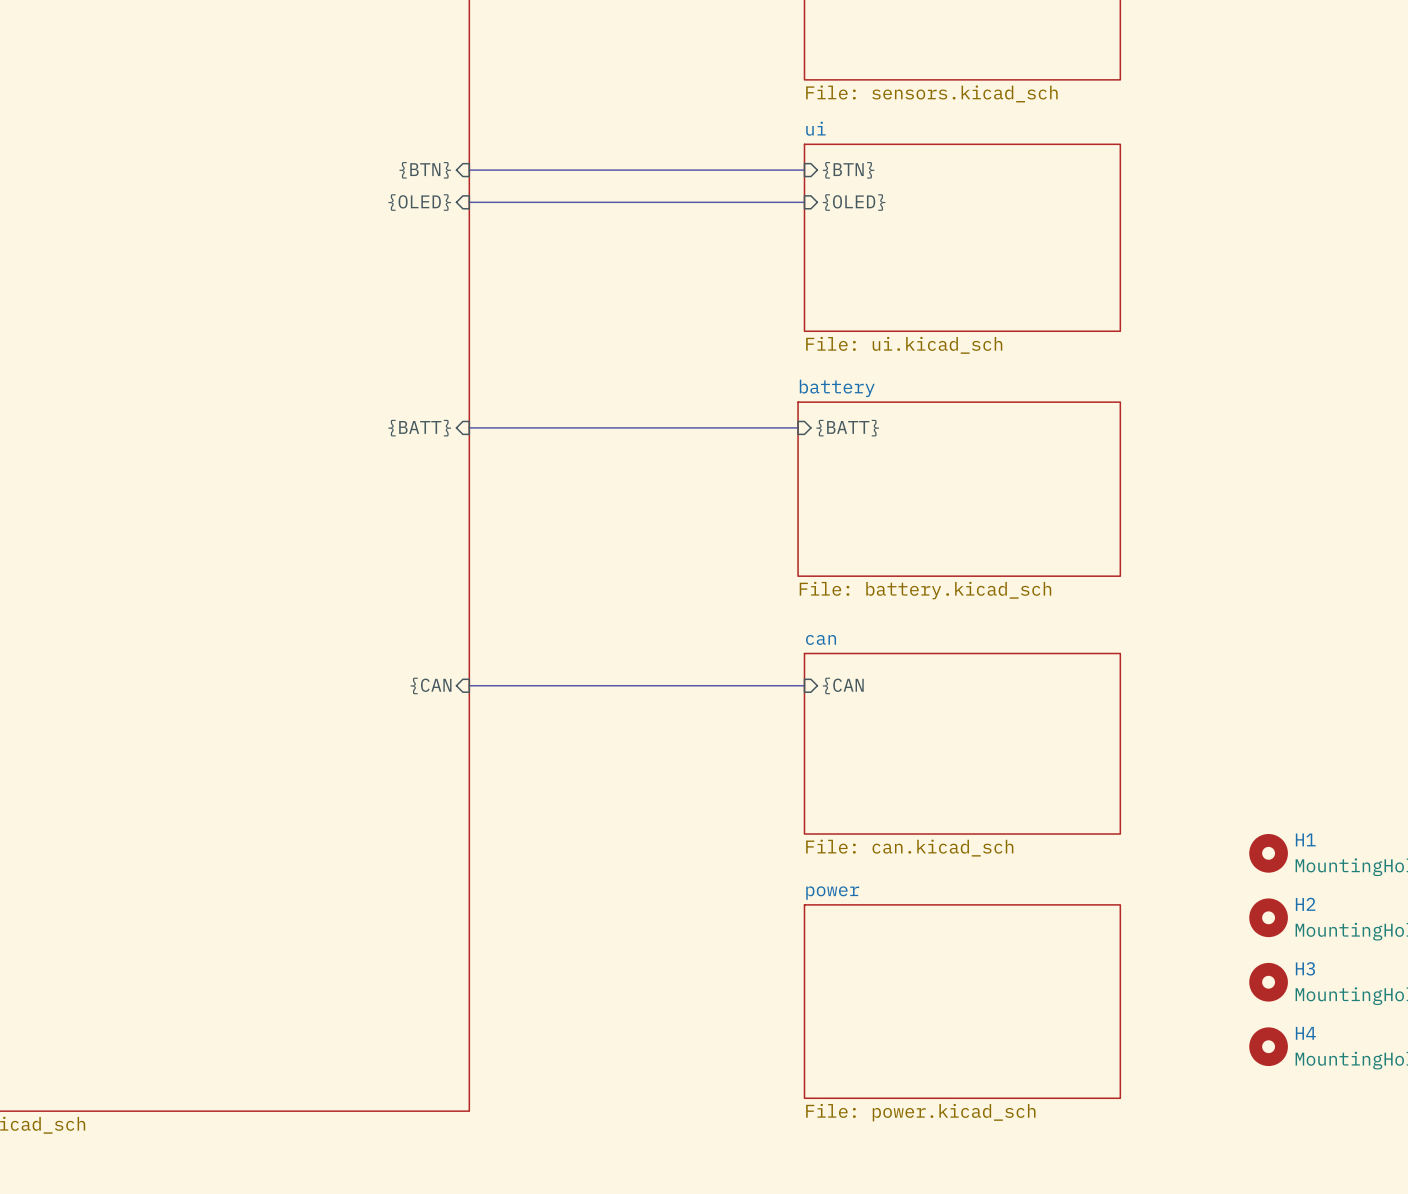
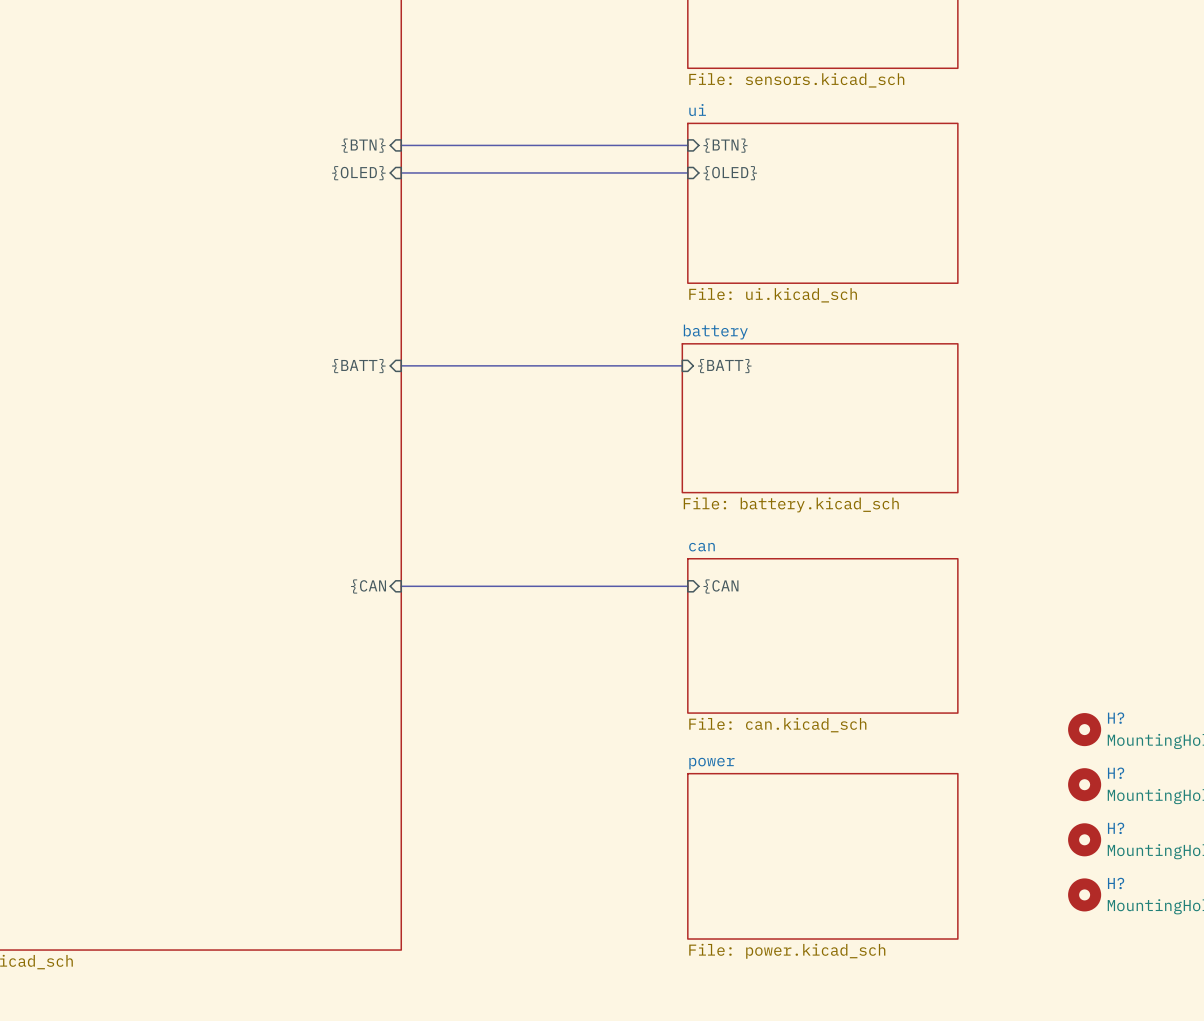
H1 name: H1 (1305, 839) -> H? (1116, 718)
H2 name: H2 (1305, 904) -> H? (1116, 773)
H3 name: H3 (1305, 968) -> H? (1116, 828)
H4 name: H4 (1305, 1033) -> H? (1116, 883)

